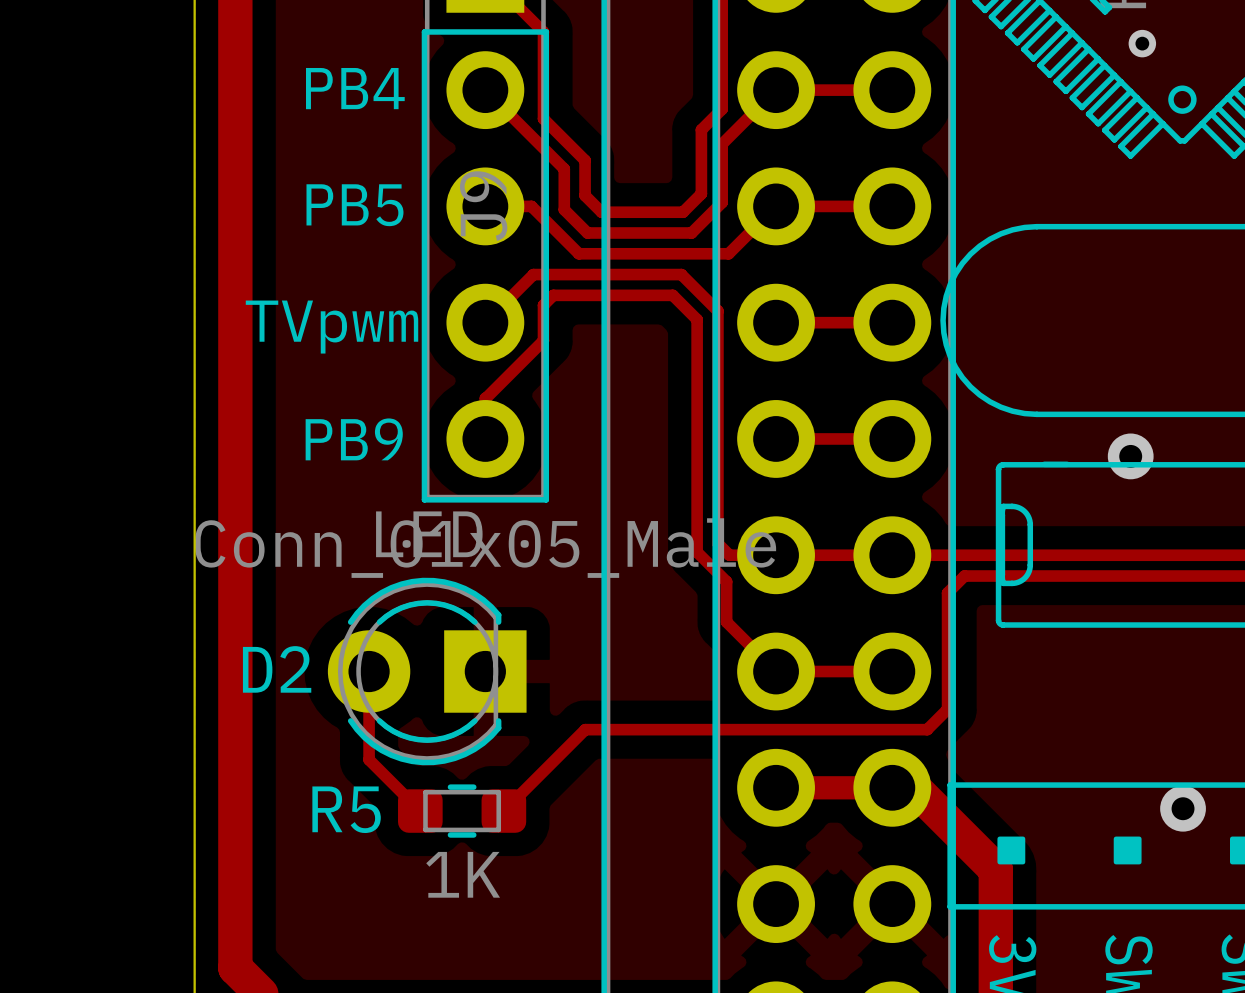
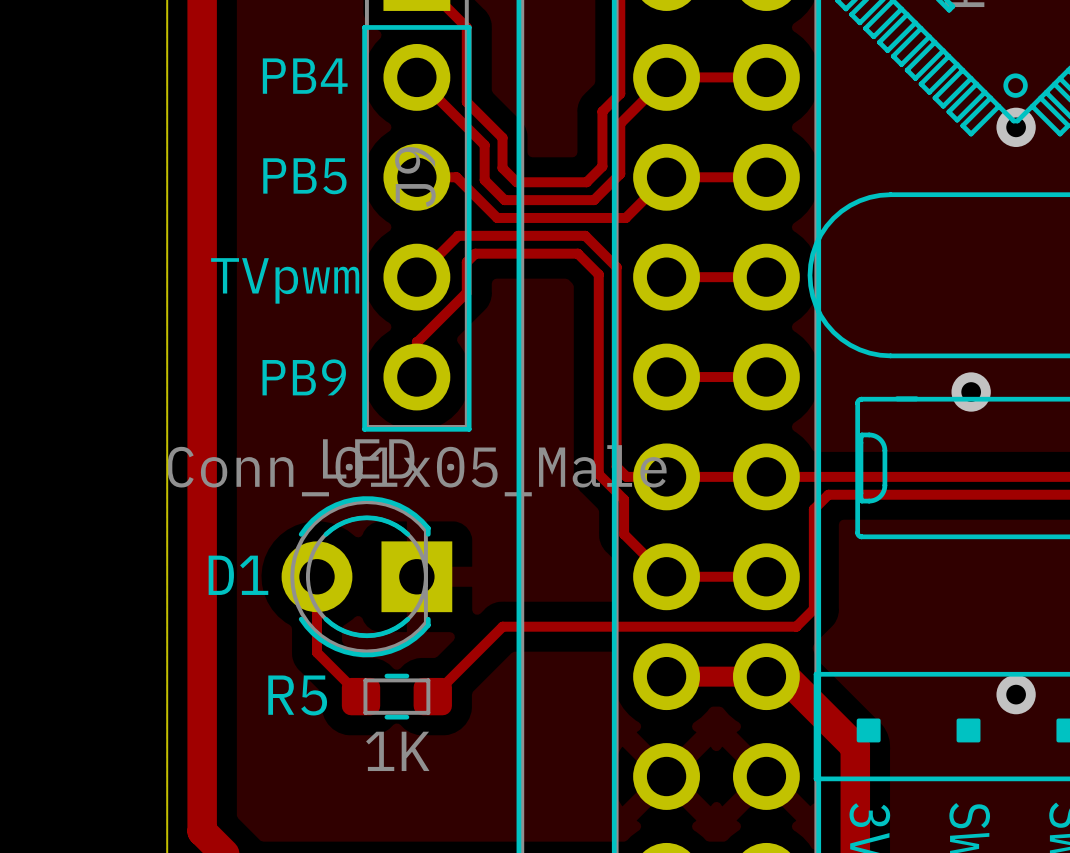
via: (1142, 43) -> none
via: none -> (1016, 127)
D2 name: D2 (277, 669) -> D1 (238, 575)

